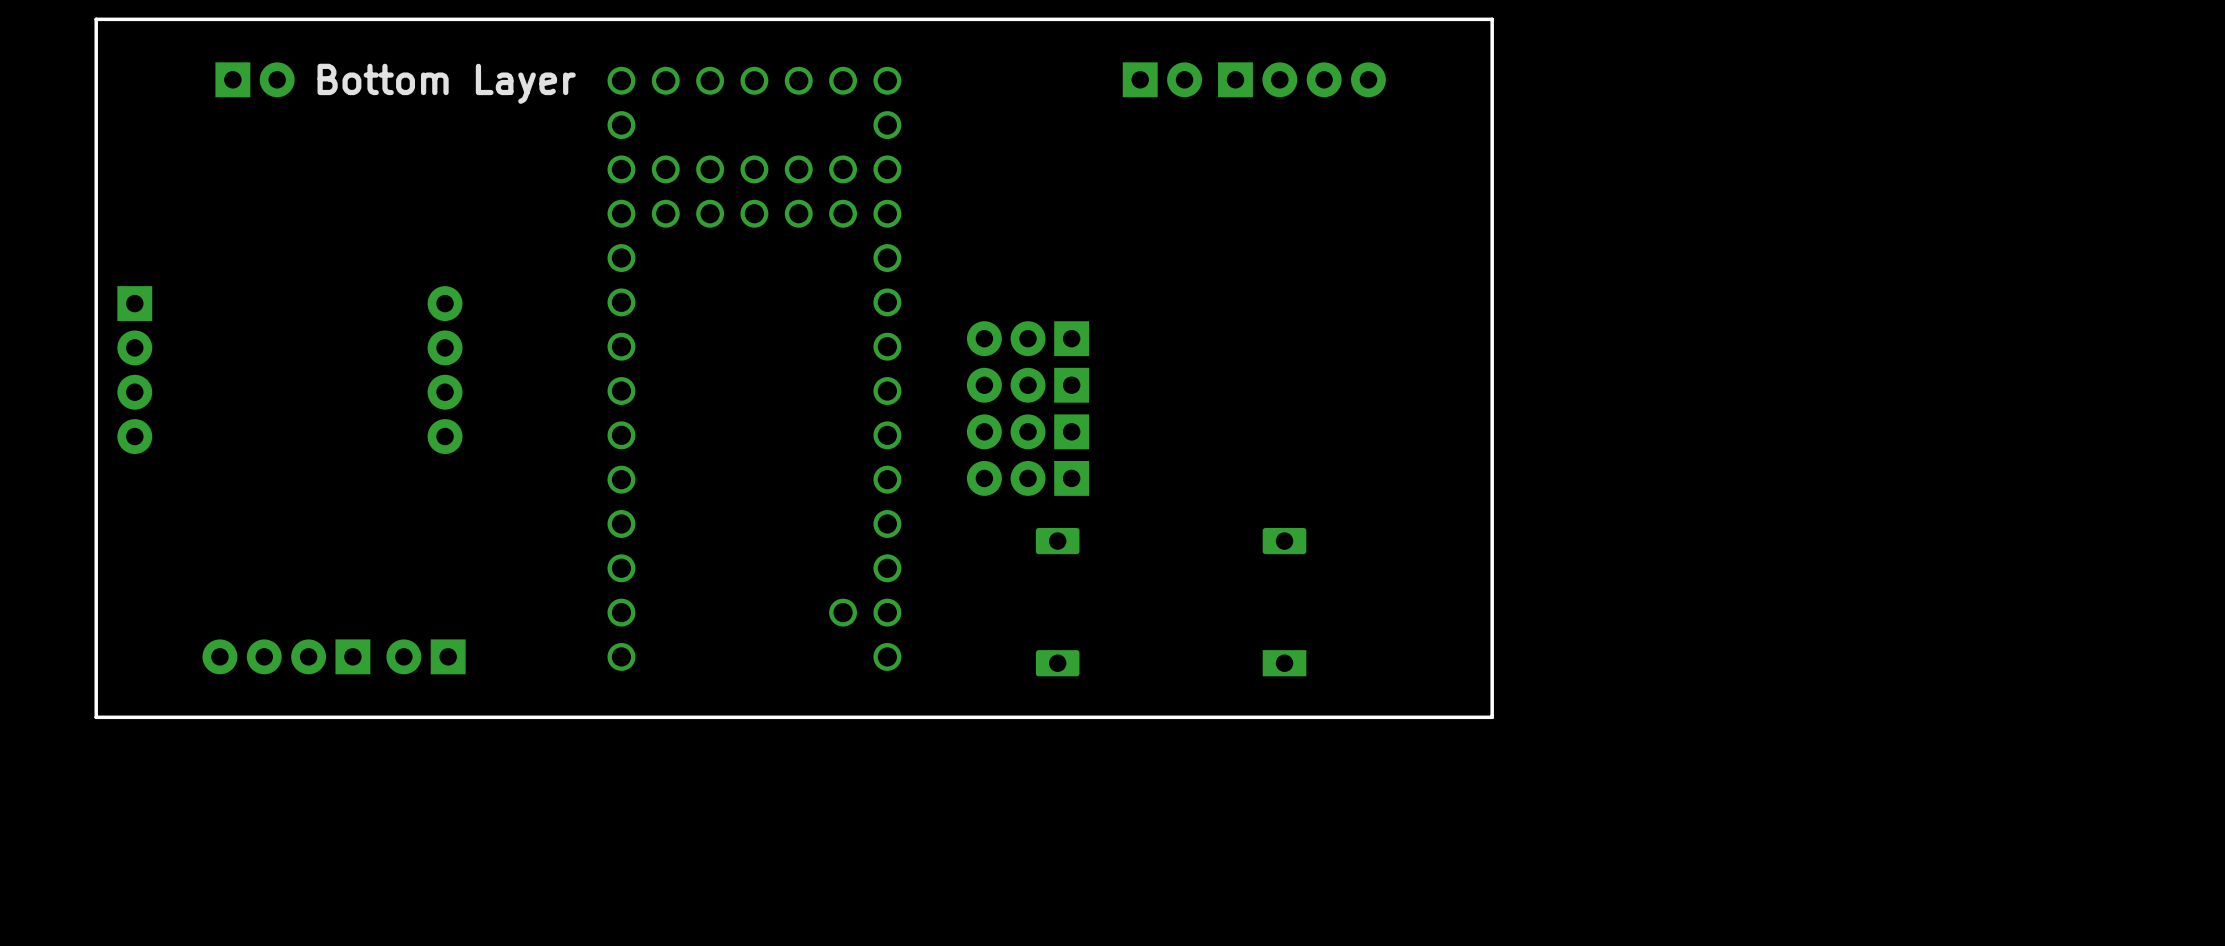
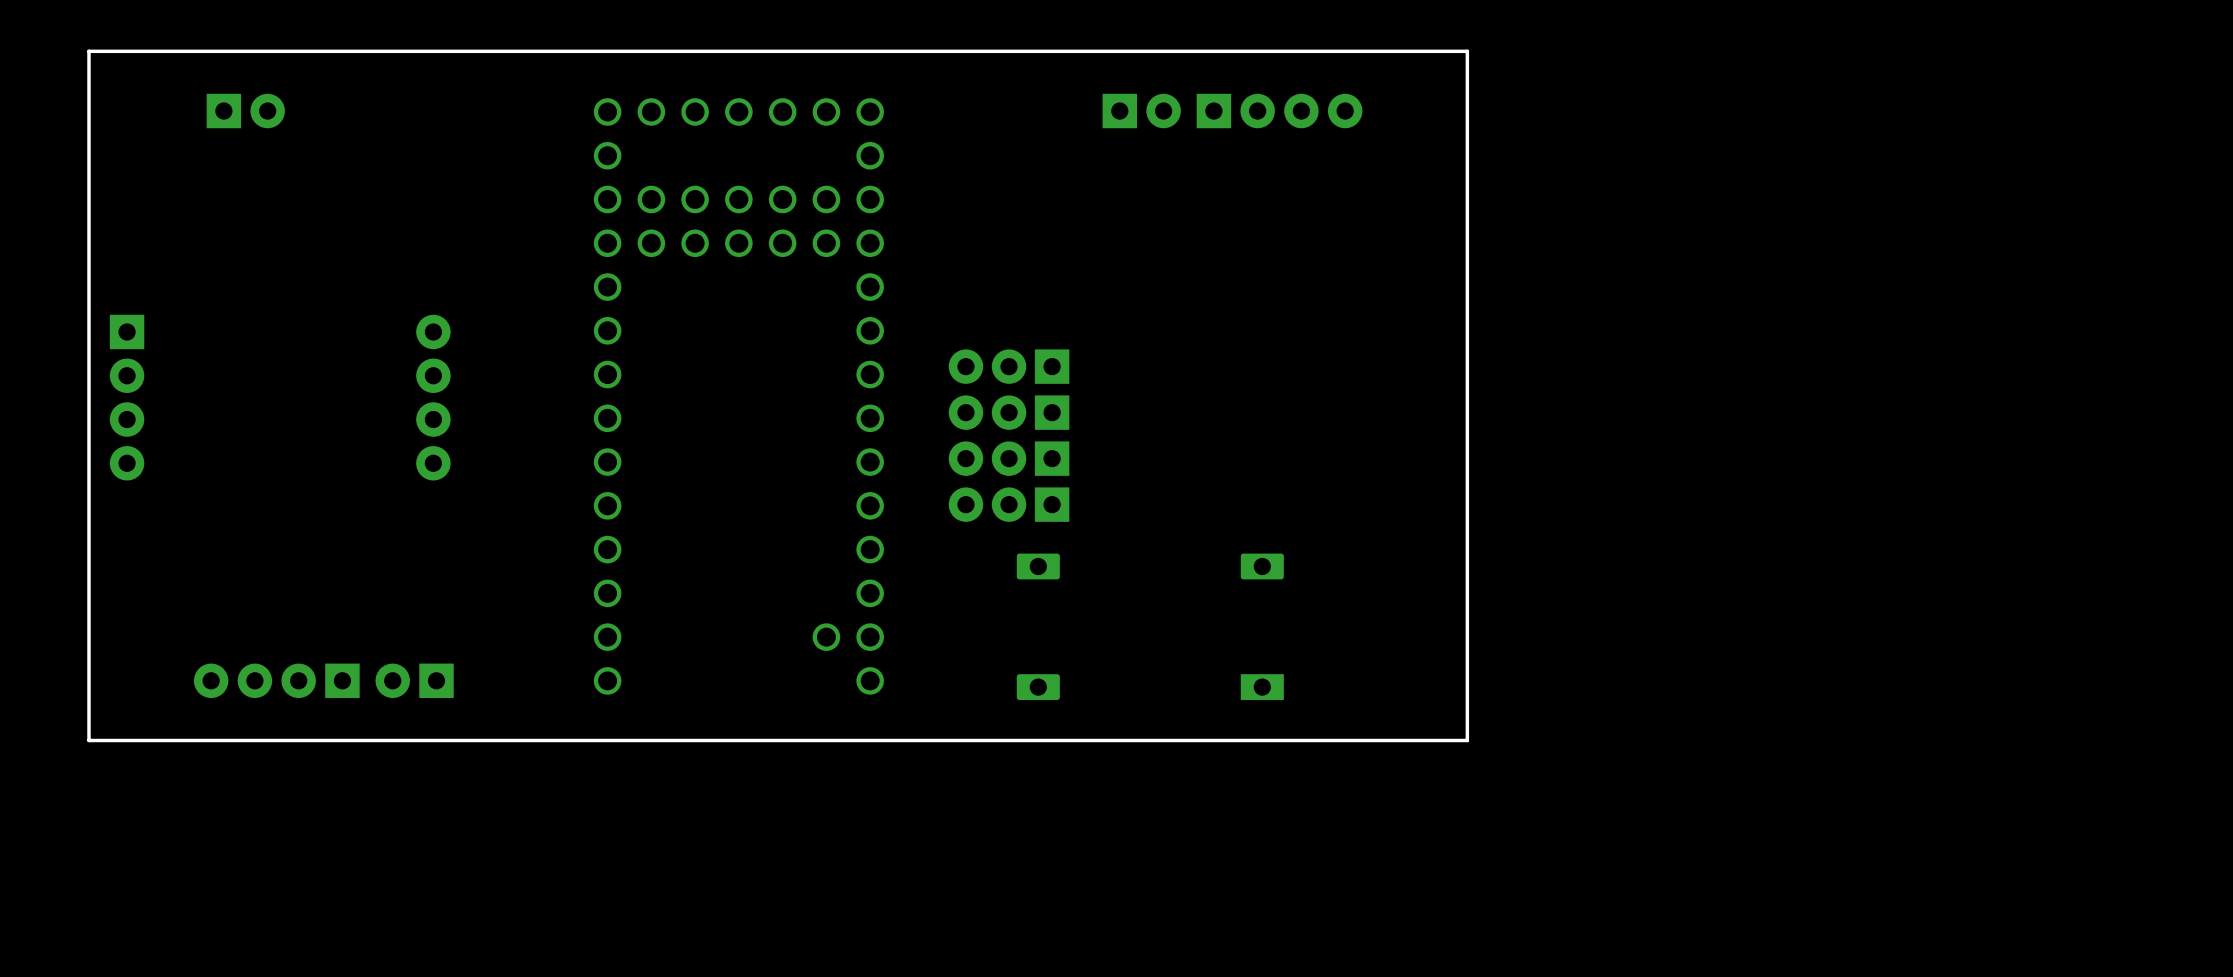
text: Bottom Layer (446, 83) -> none

